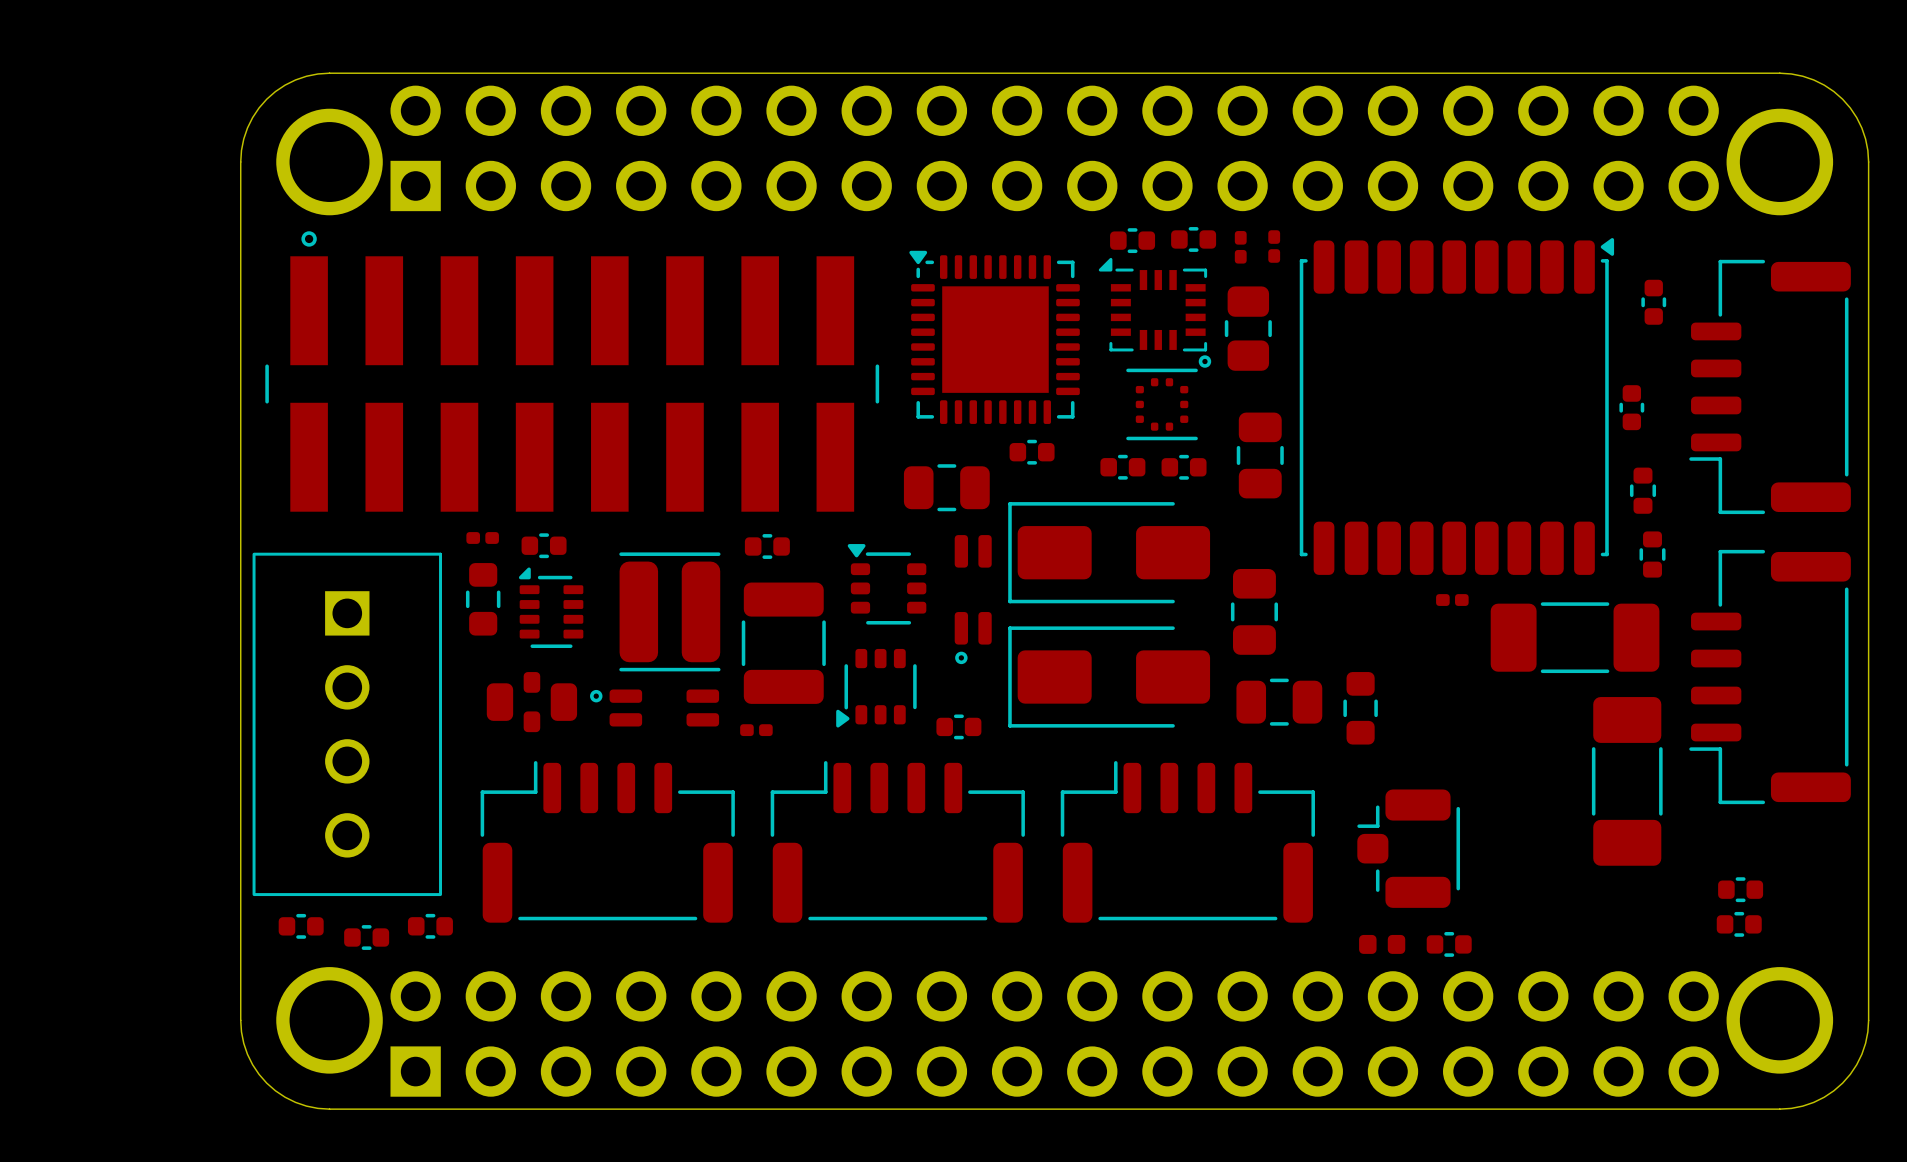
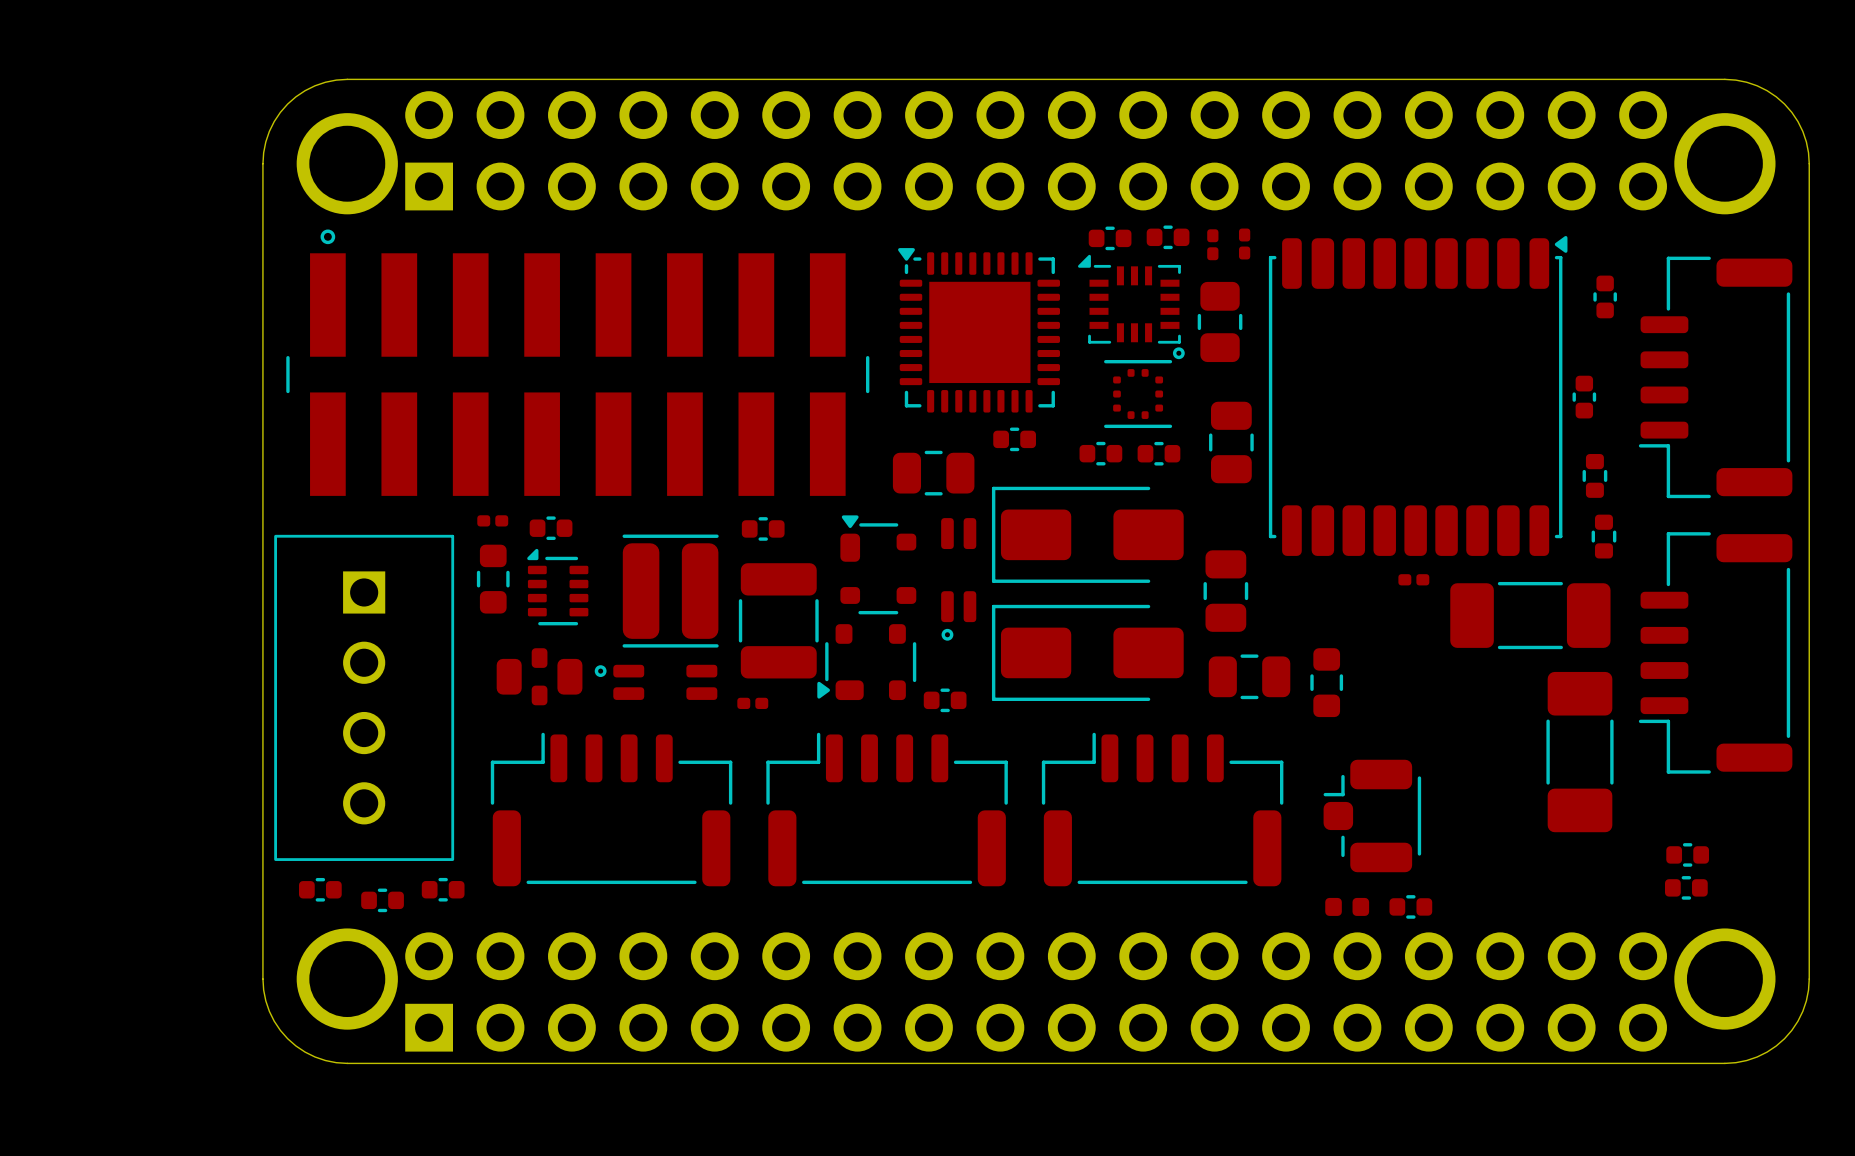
part footprint: [847, 544, 927, 625] -> [840, 515, 917, 615]
part footprint: [836, 648, 917, 728] -> [817, 624, 917, 701]

